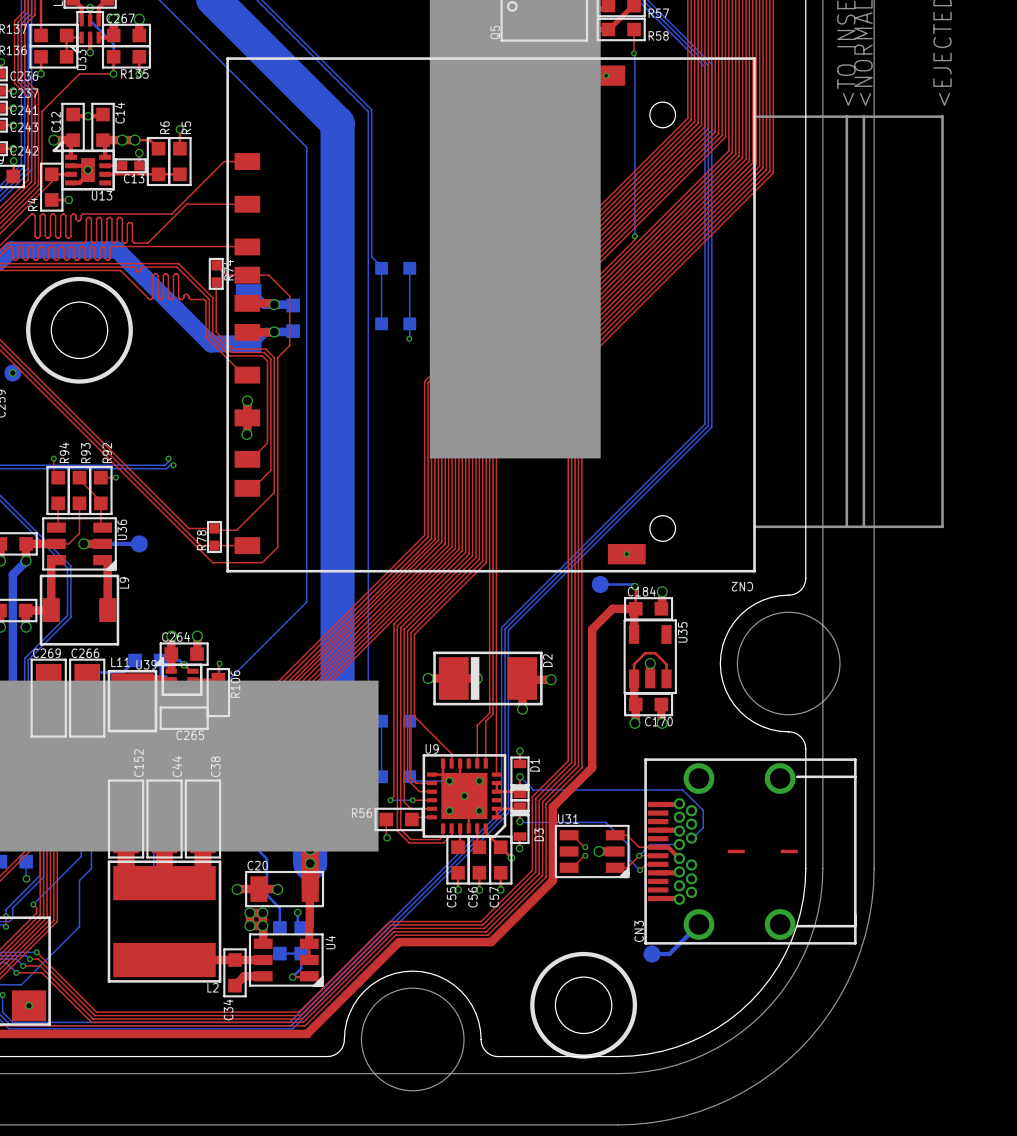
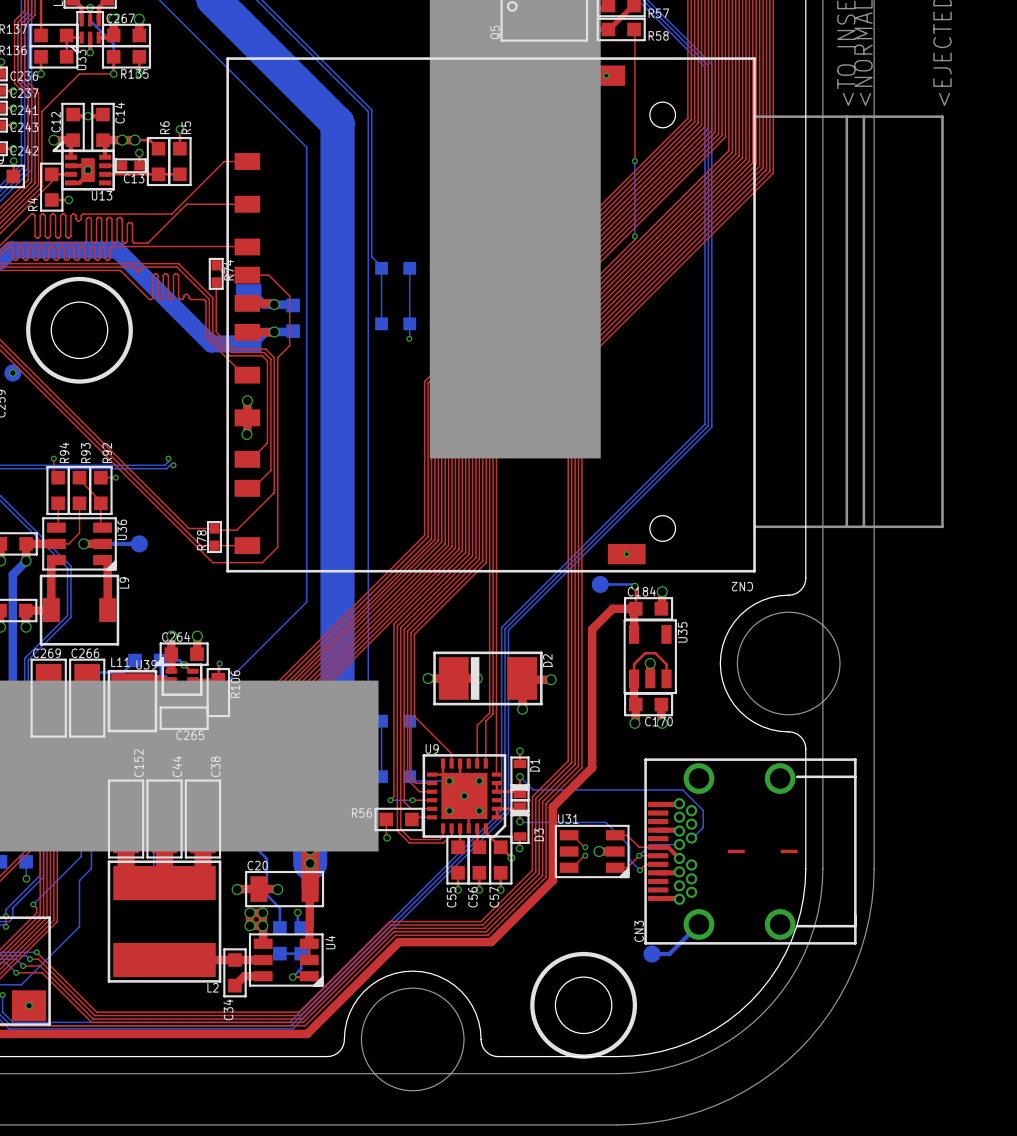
top track: (634, 29) (634, 53) -> (634, 29) (634, 161)
bottom track: (634, 53) (634, 161) -> none
via: (634, 53) -> none
via: none -> (634, 161)

